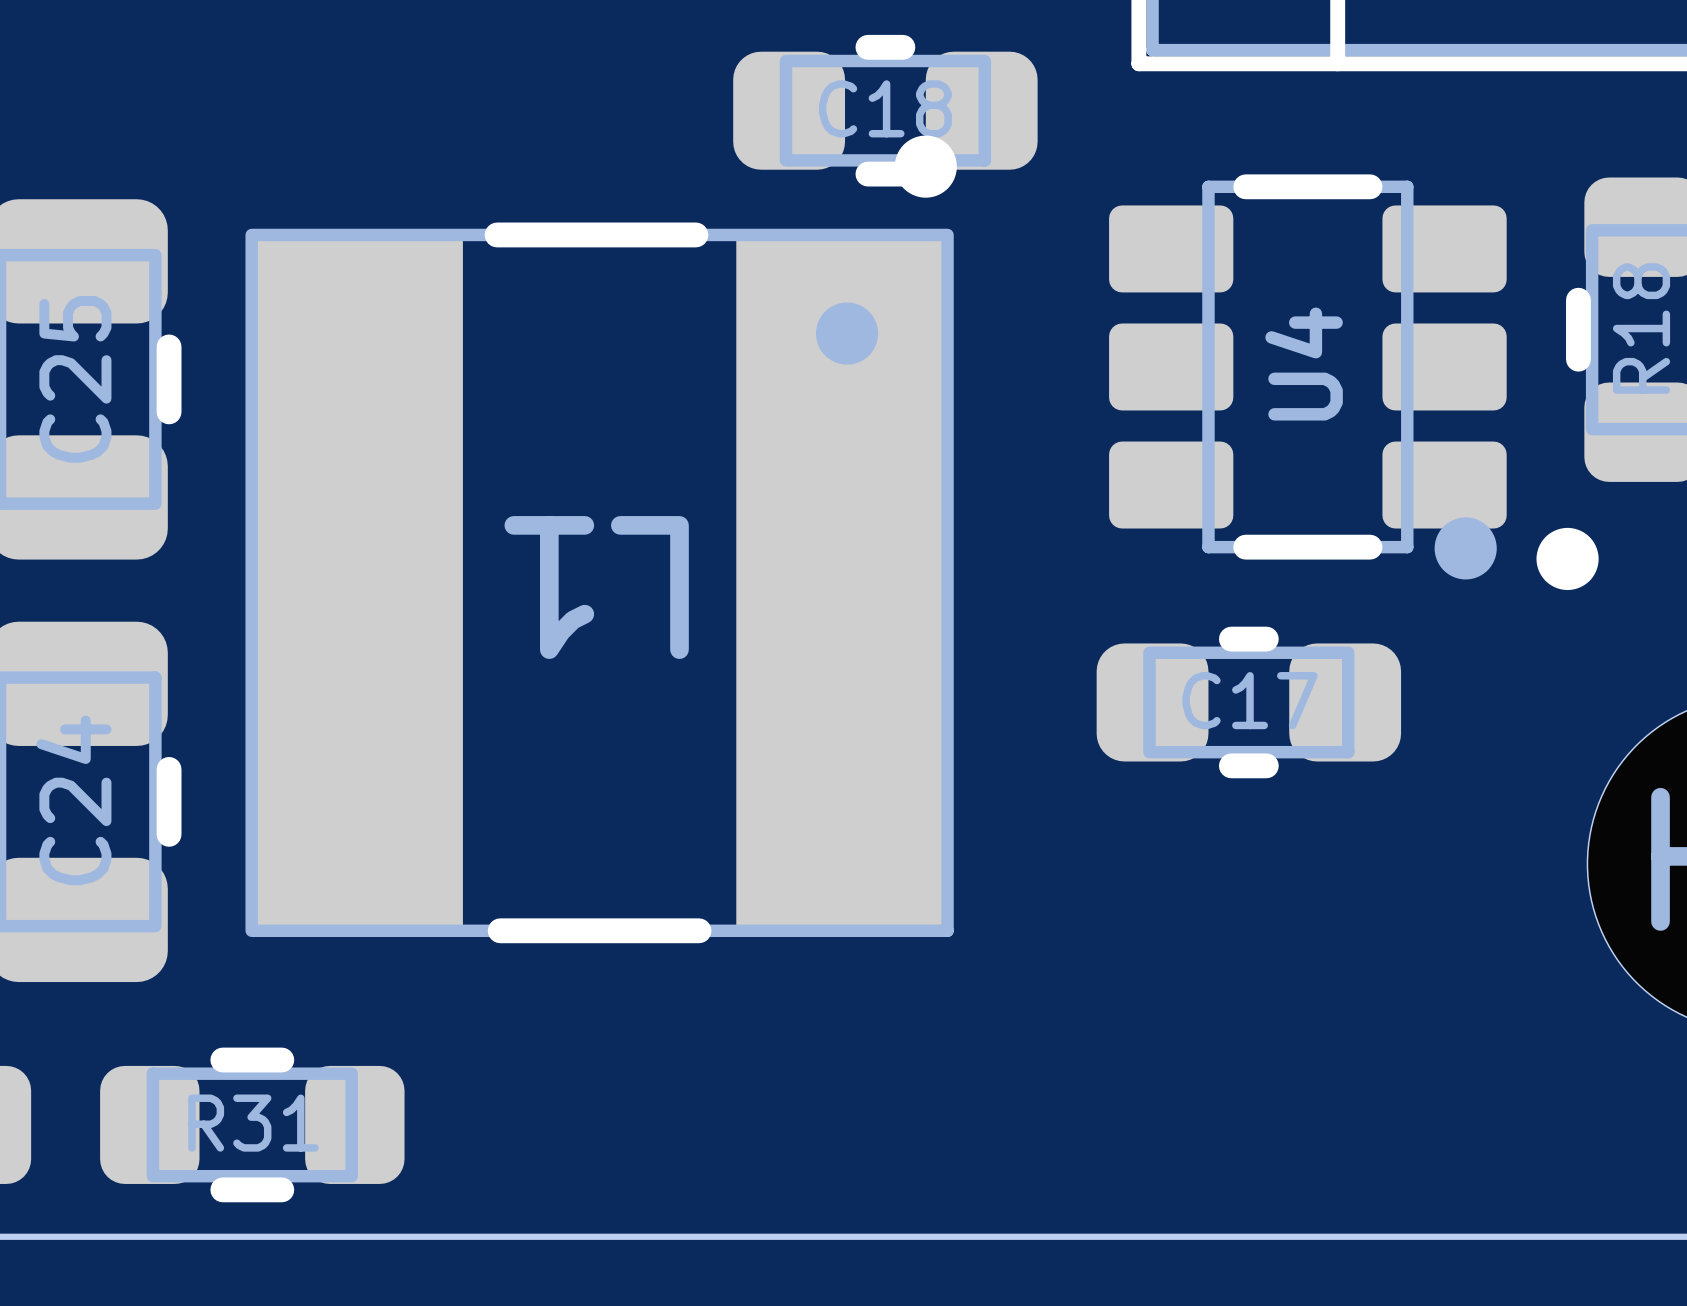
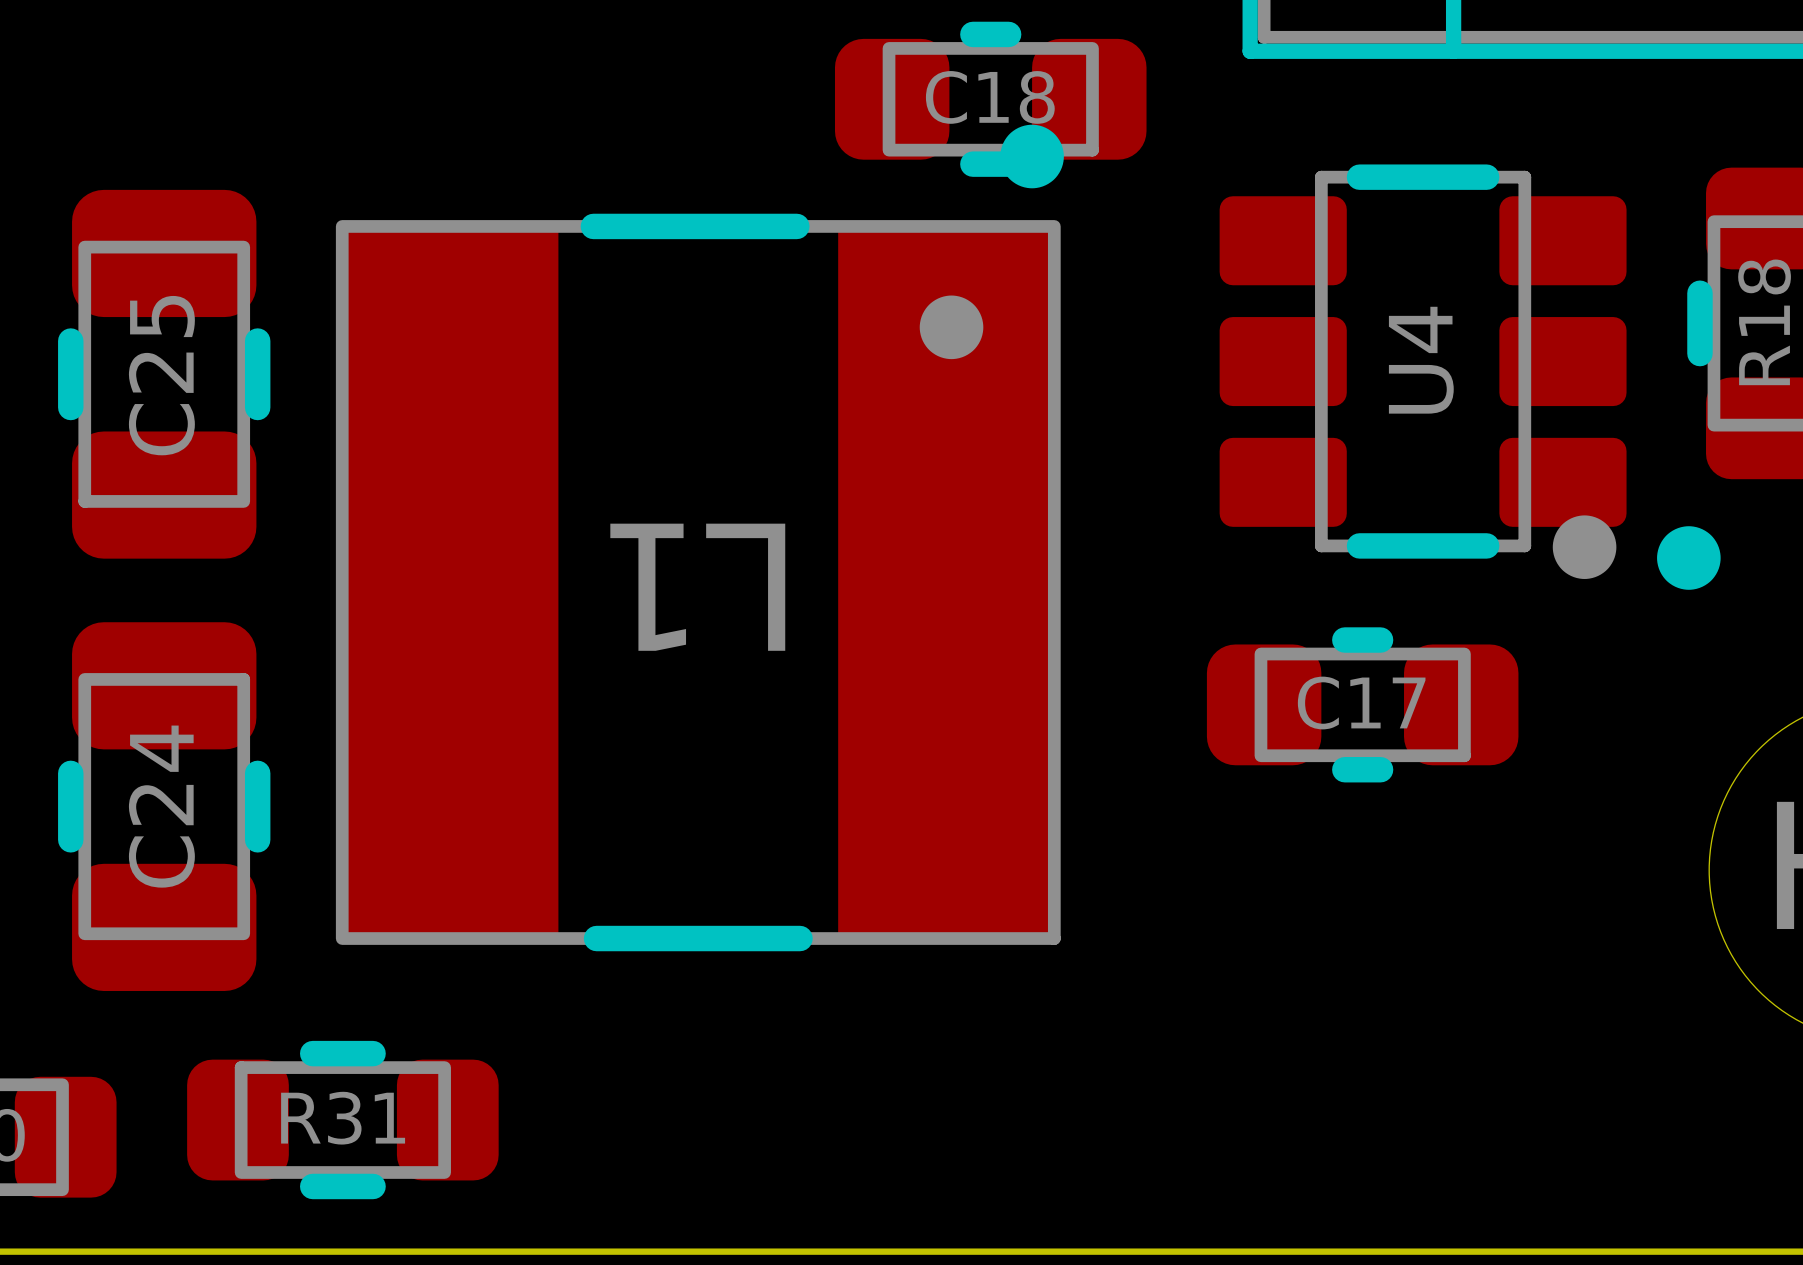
R31 position: (252, 1124) -> (342, 1120)

